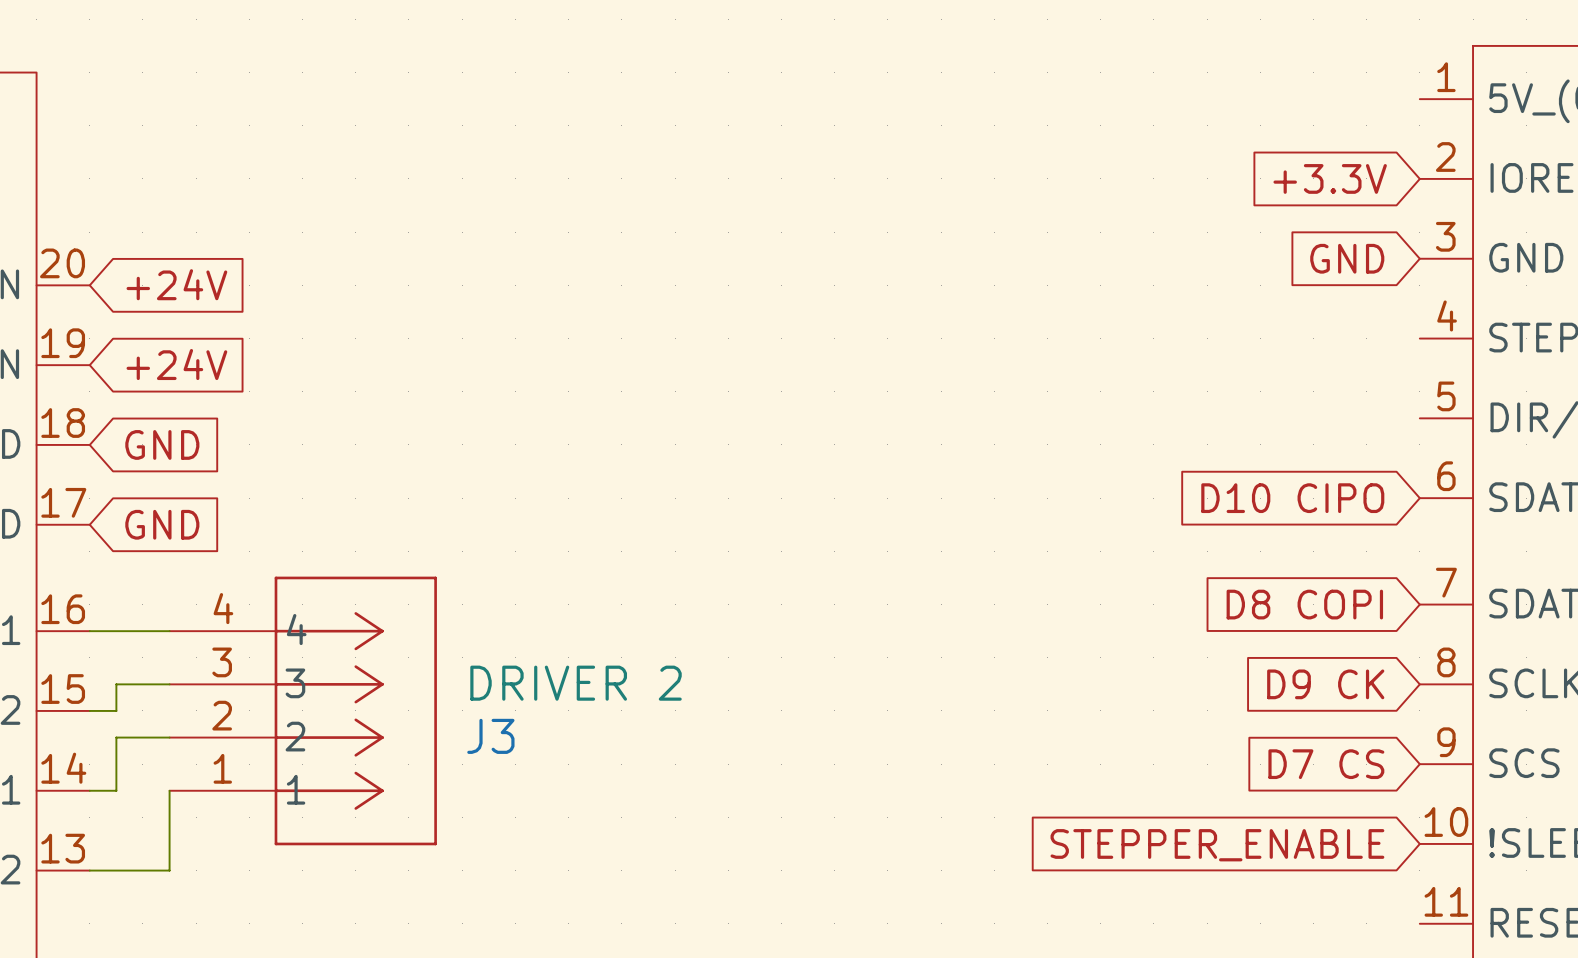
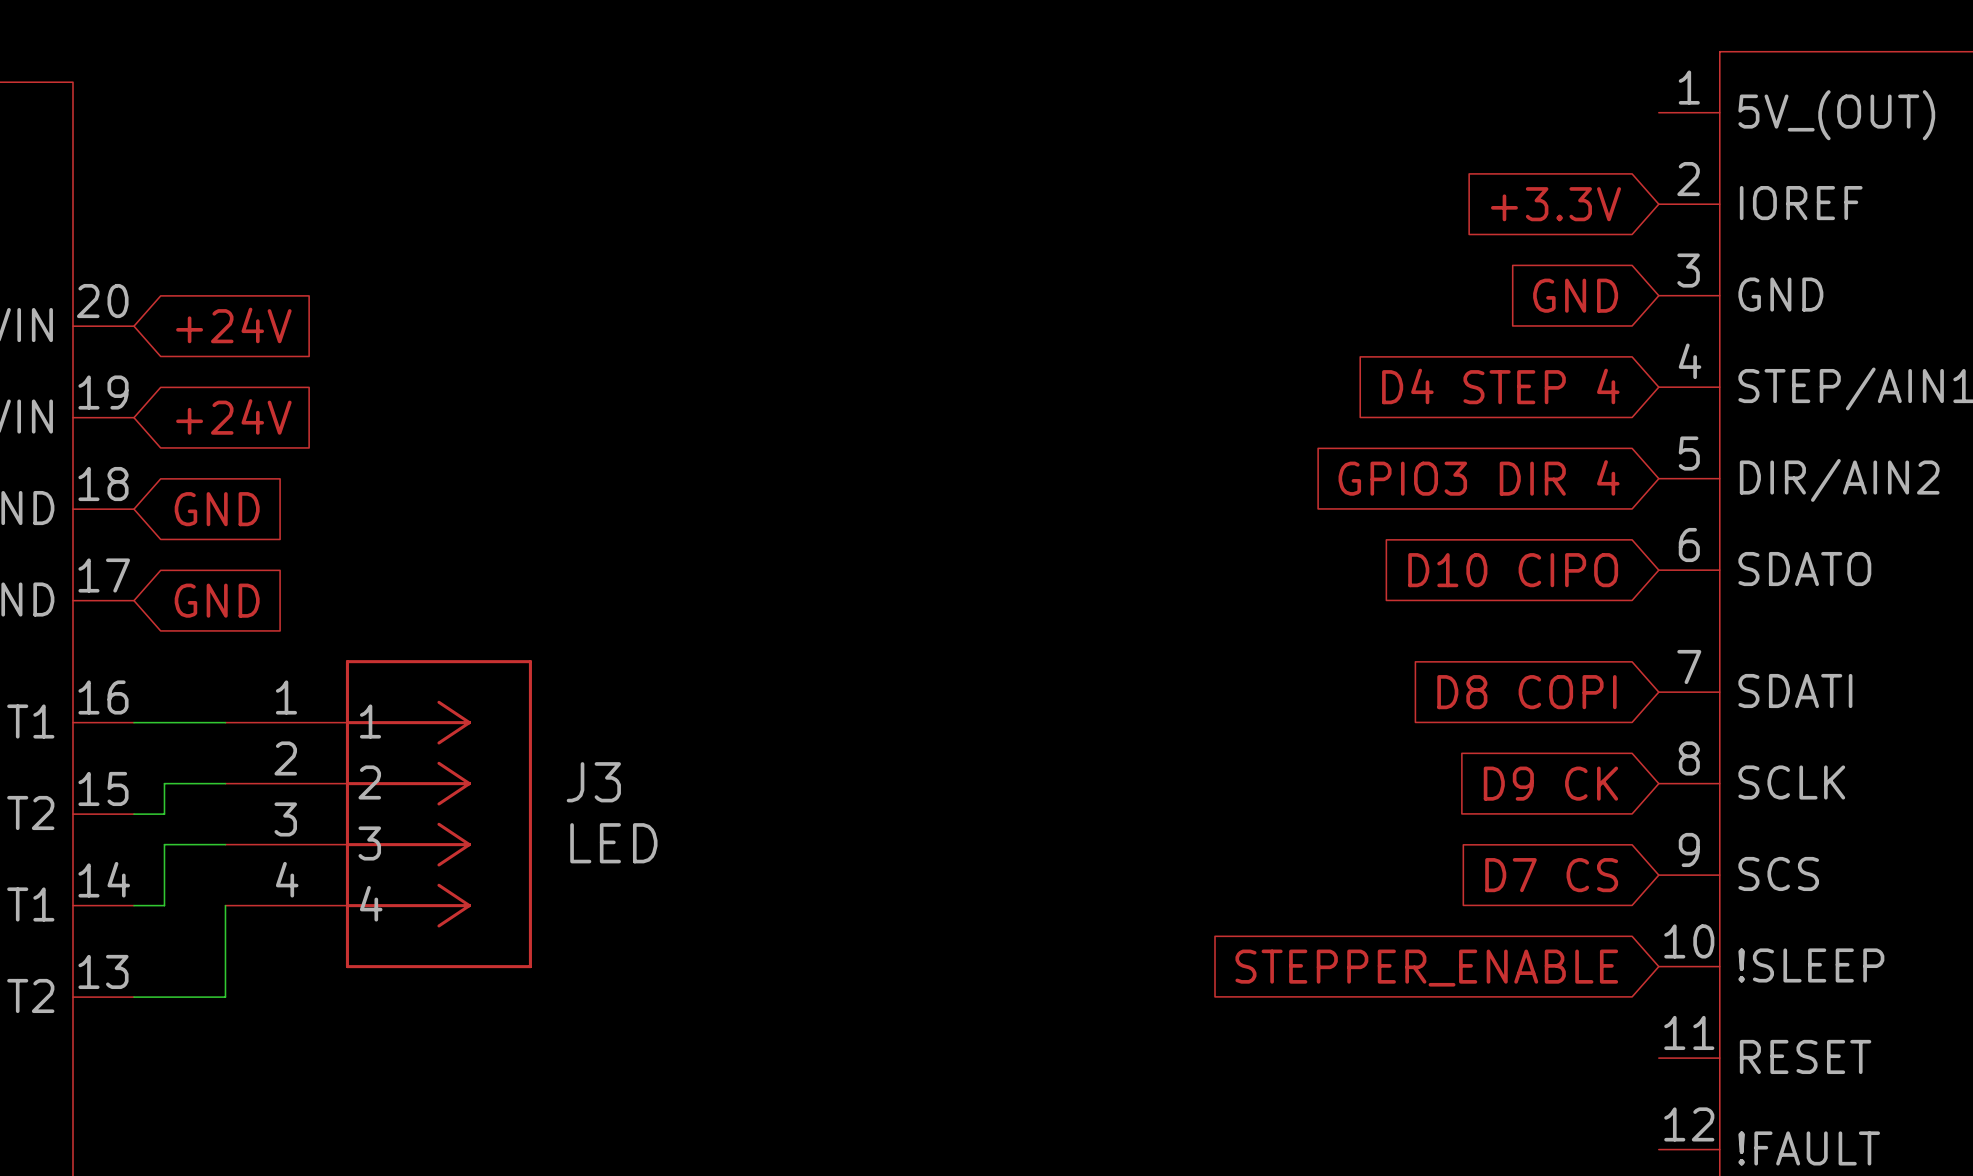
global label: none -> D4 STEP 4 (1500, 386)
global label: none -> GPIO3 DIR 4 (1479, 477)
J3 value: DRIVER 2 (576, 683) -> LED (613, 843)
J3 flip: as is (355, 710) -> up-down (438, 814)

